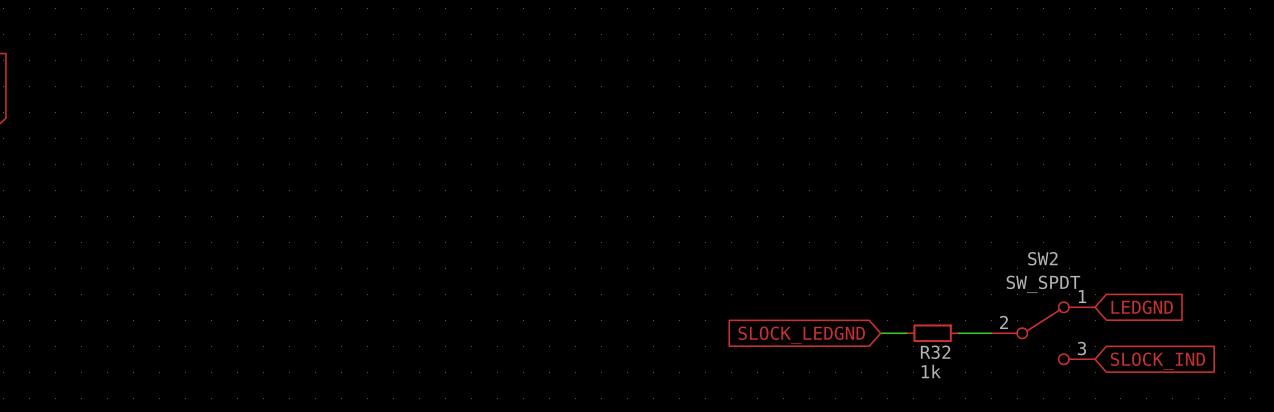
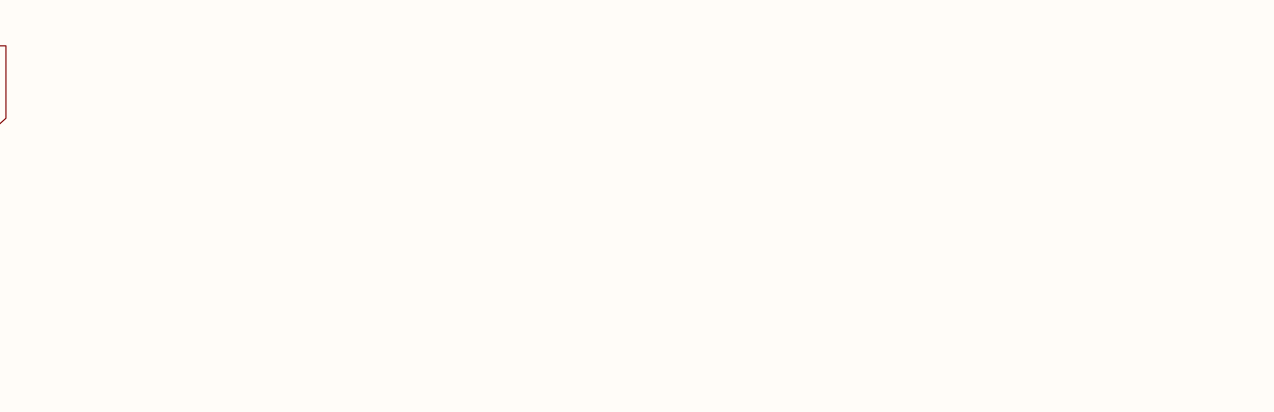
global label: LEDGND (1142, 307) -> none
wire: (880, 333) (906, 333) -> none
R32: 1k (932, 333) -> none
wire: (958, 333) (991, 333) -> none
SW2: SW_SPDT (1043, 333) -> none
global label: SLOCK_LEDGND (801, 335) -> none
global label: SLOCK_IND (1157, 361) -> none

